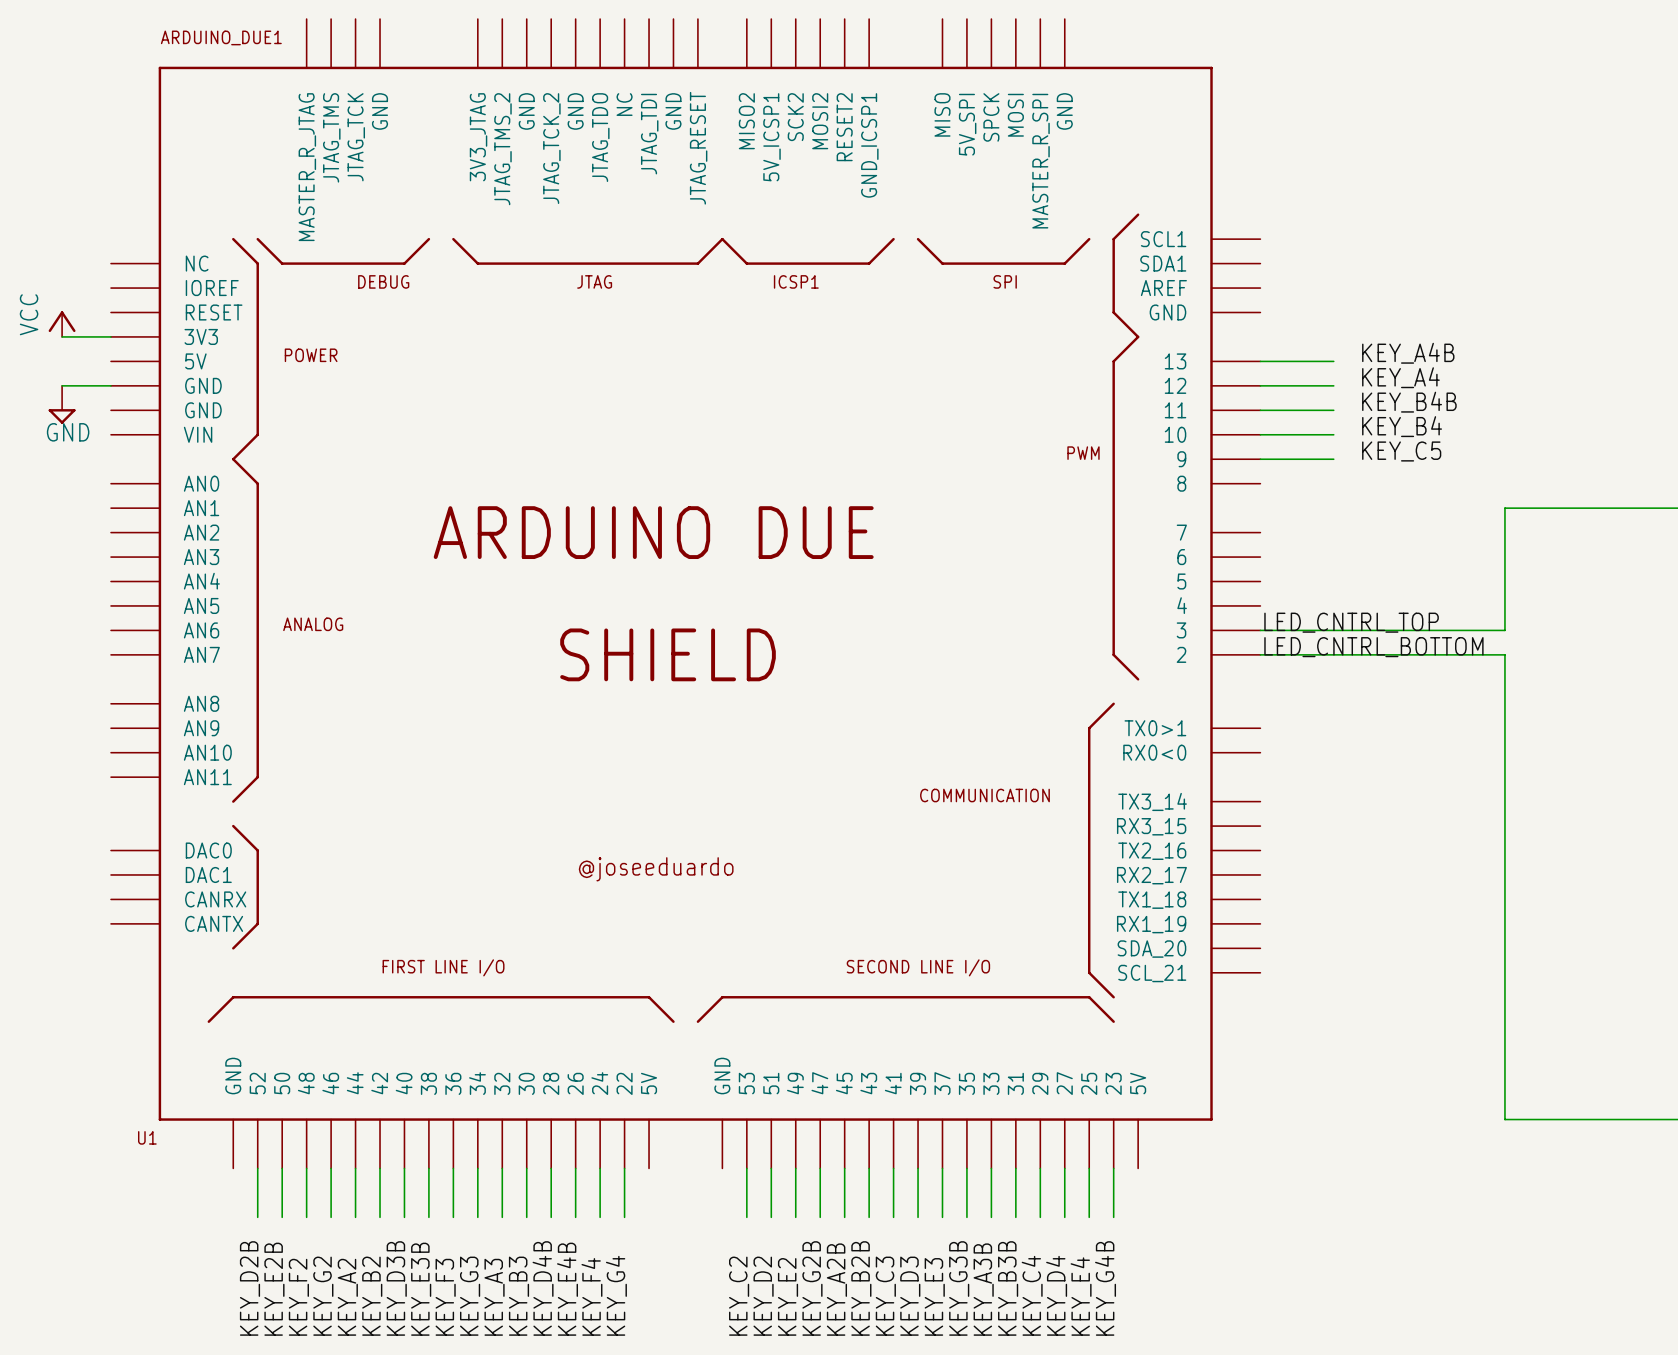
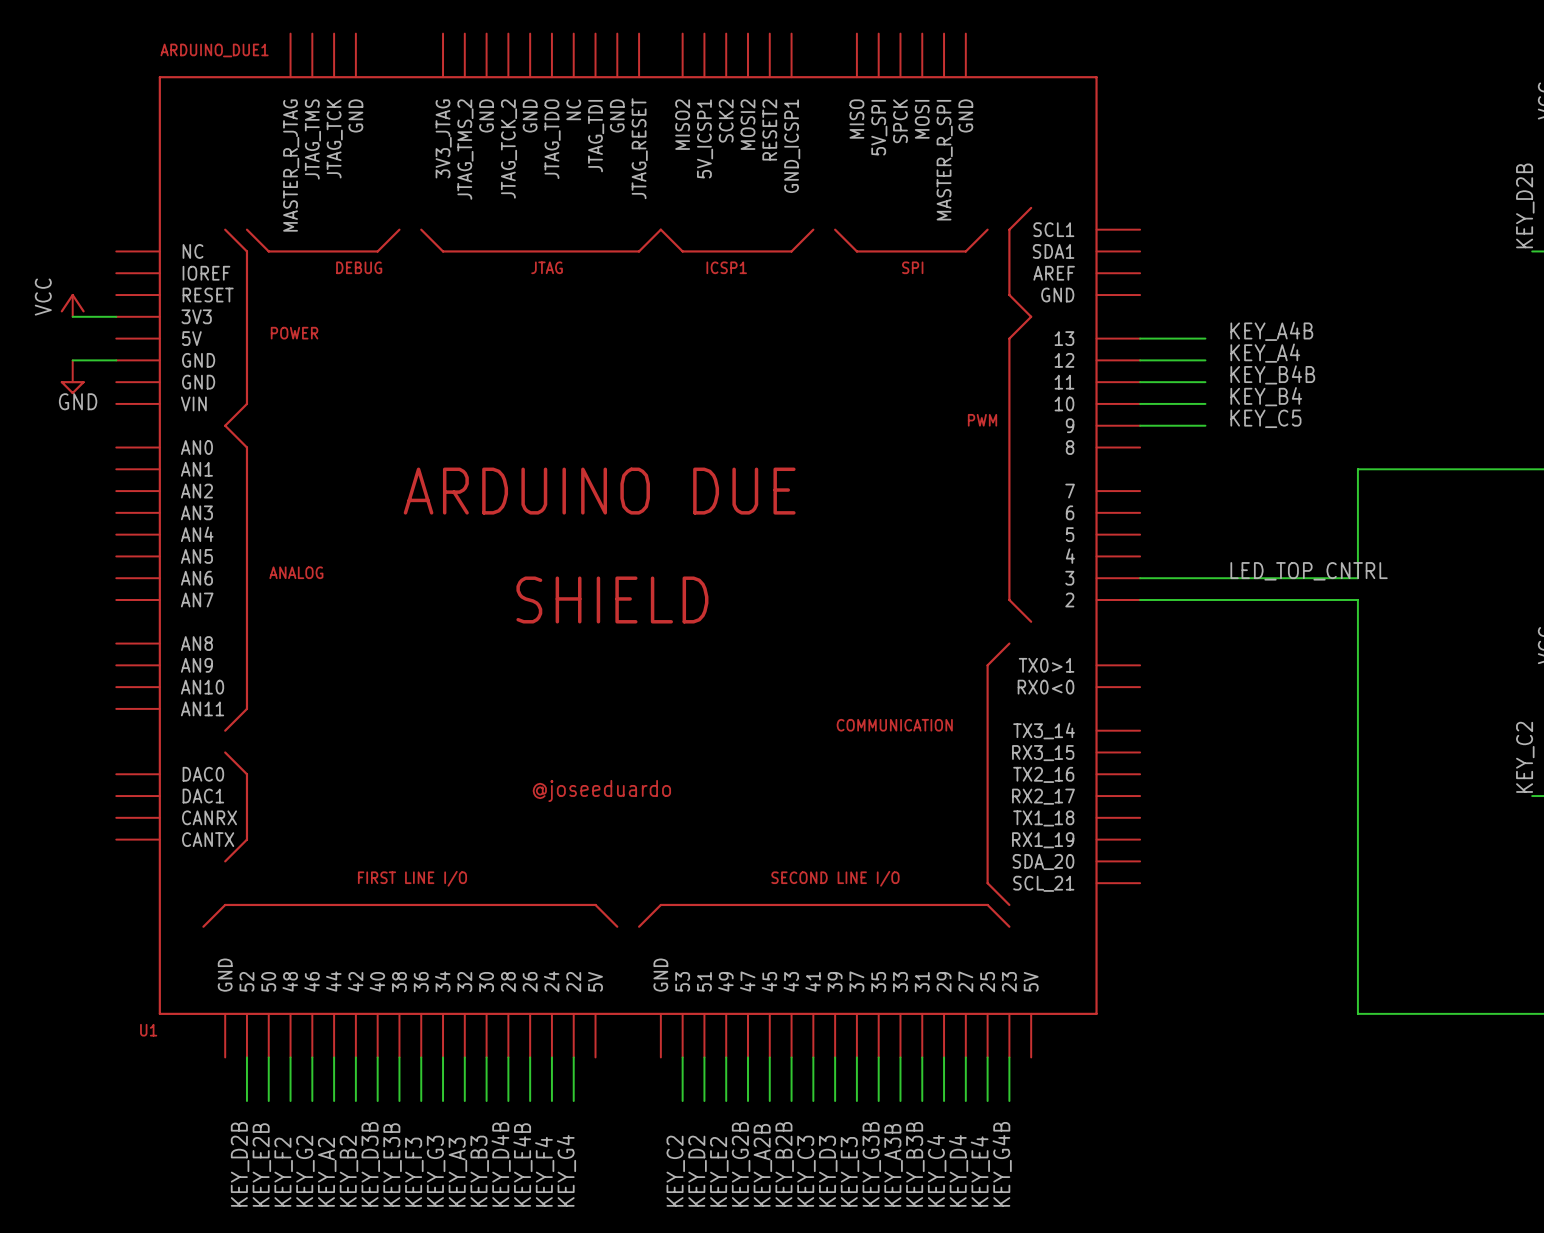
label: LED_CNTRL_TOP (1351, 622) -> none
label: none -> LED_TOP_CNTRL (1309, 571)
label: LED_CNTRL_BOTTOM (1373, 647) -> none

